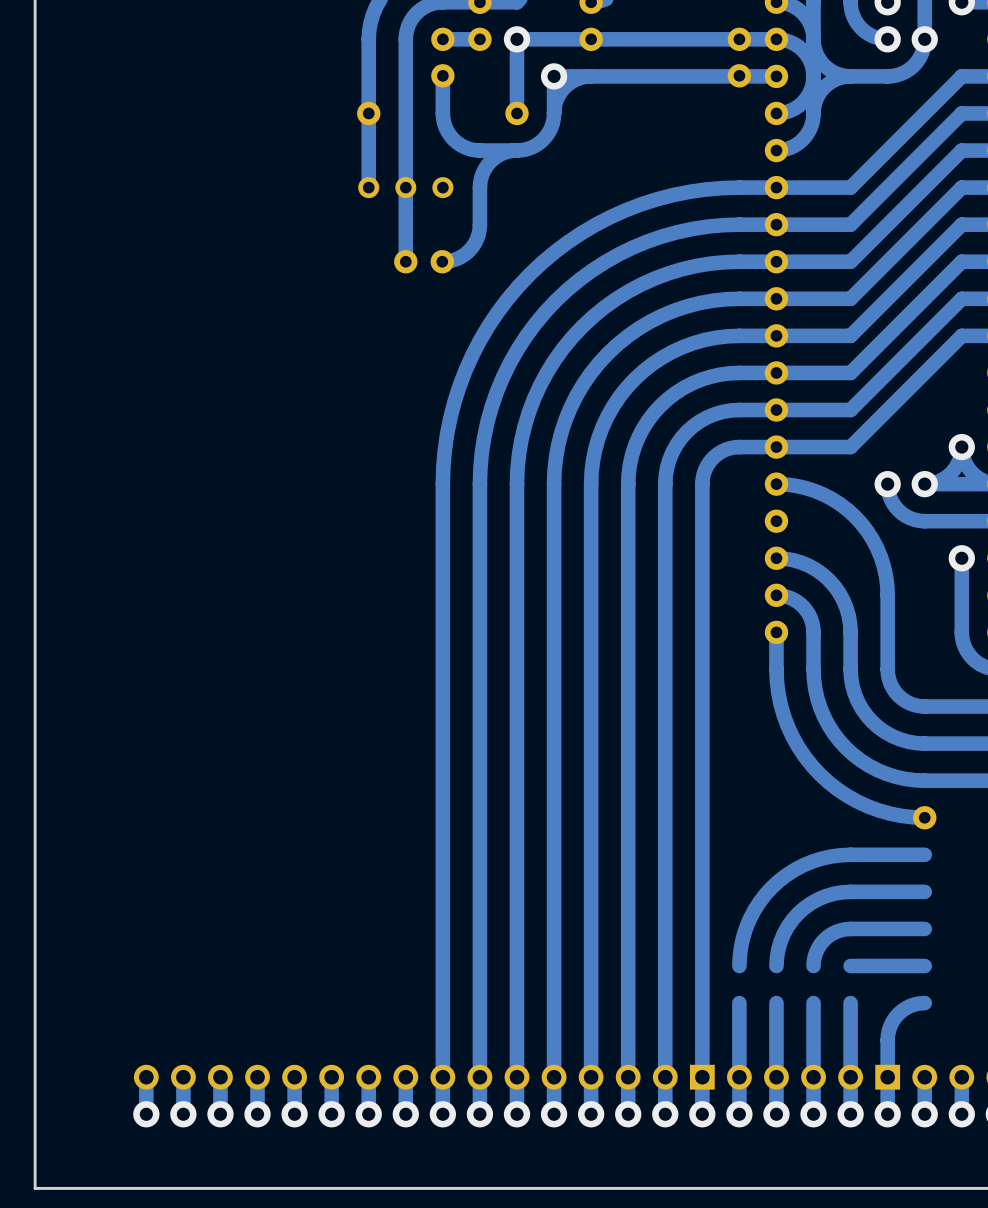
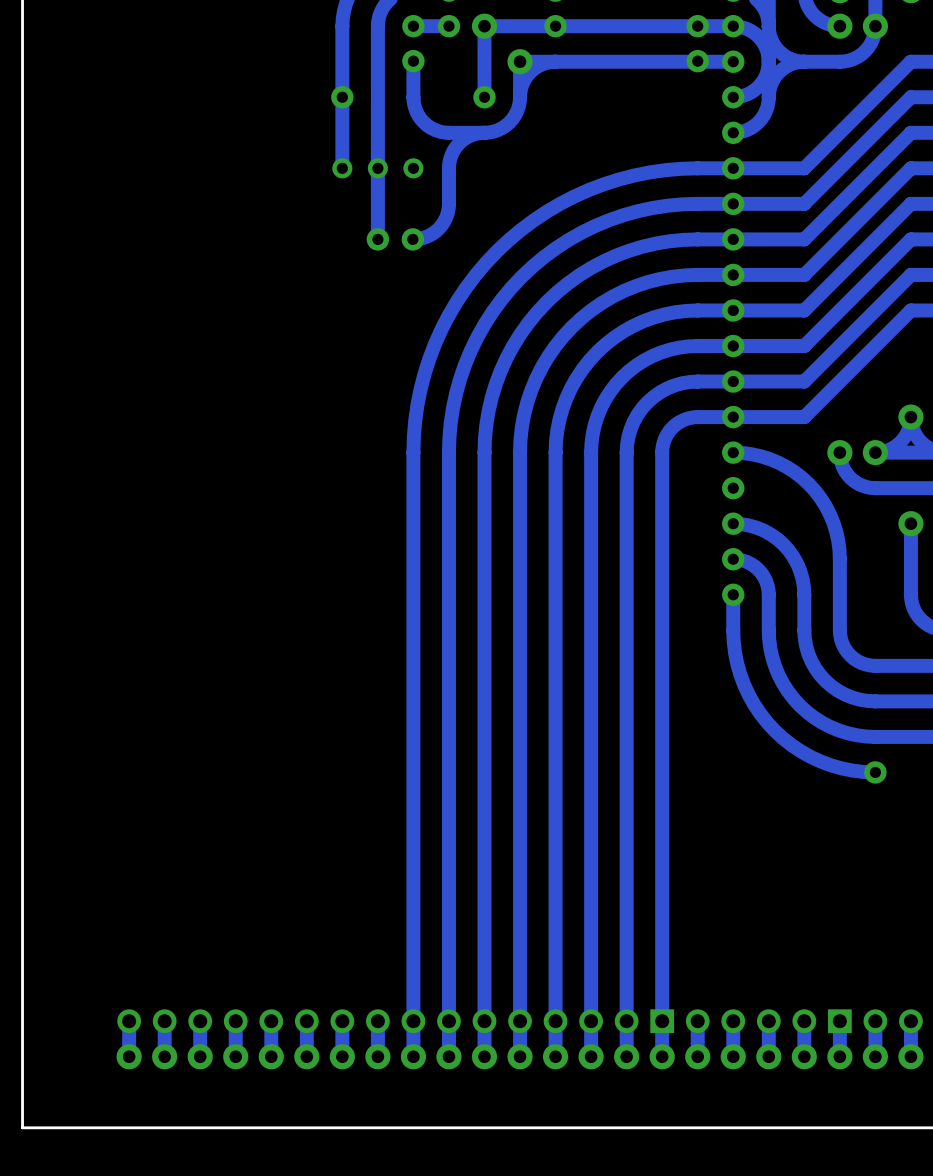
track: (924, 854) (840, 855) (821, 858) (795, 869) (771, 887) (754, 910) (743, 937) (739, 966) -> none
track: (924, 891) (842, 892) (818, 899) (798, 913) (787, 926) (780, 941) (776, 966) -> none
track: (924, 928) (841, 930) (828, 936) (821, 943) (816, 951) (813, 966) -> none
track: (924, 966) (850, 966) -> none
track: (739, 1003) (739, 1077) -> none
track: (776, 1003) (776, 1077) -> none
track: (813, 1003) (813, 1077) -> none
track: (850, 1003) (850, 1077) -> none
track: (924, 1003) (906, 1008) (892, 1021) (887, 1035) (887, 1077) -> none

